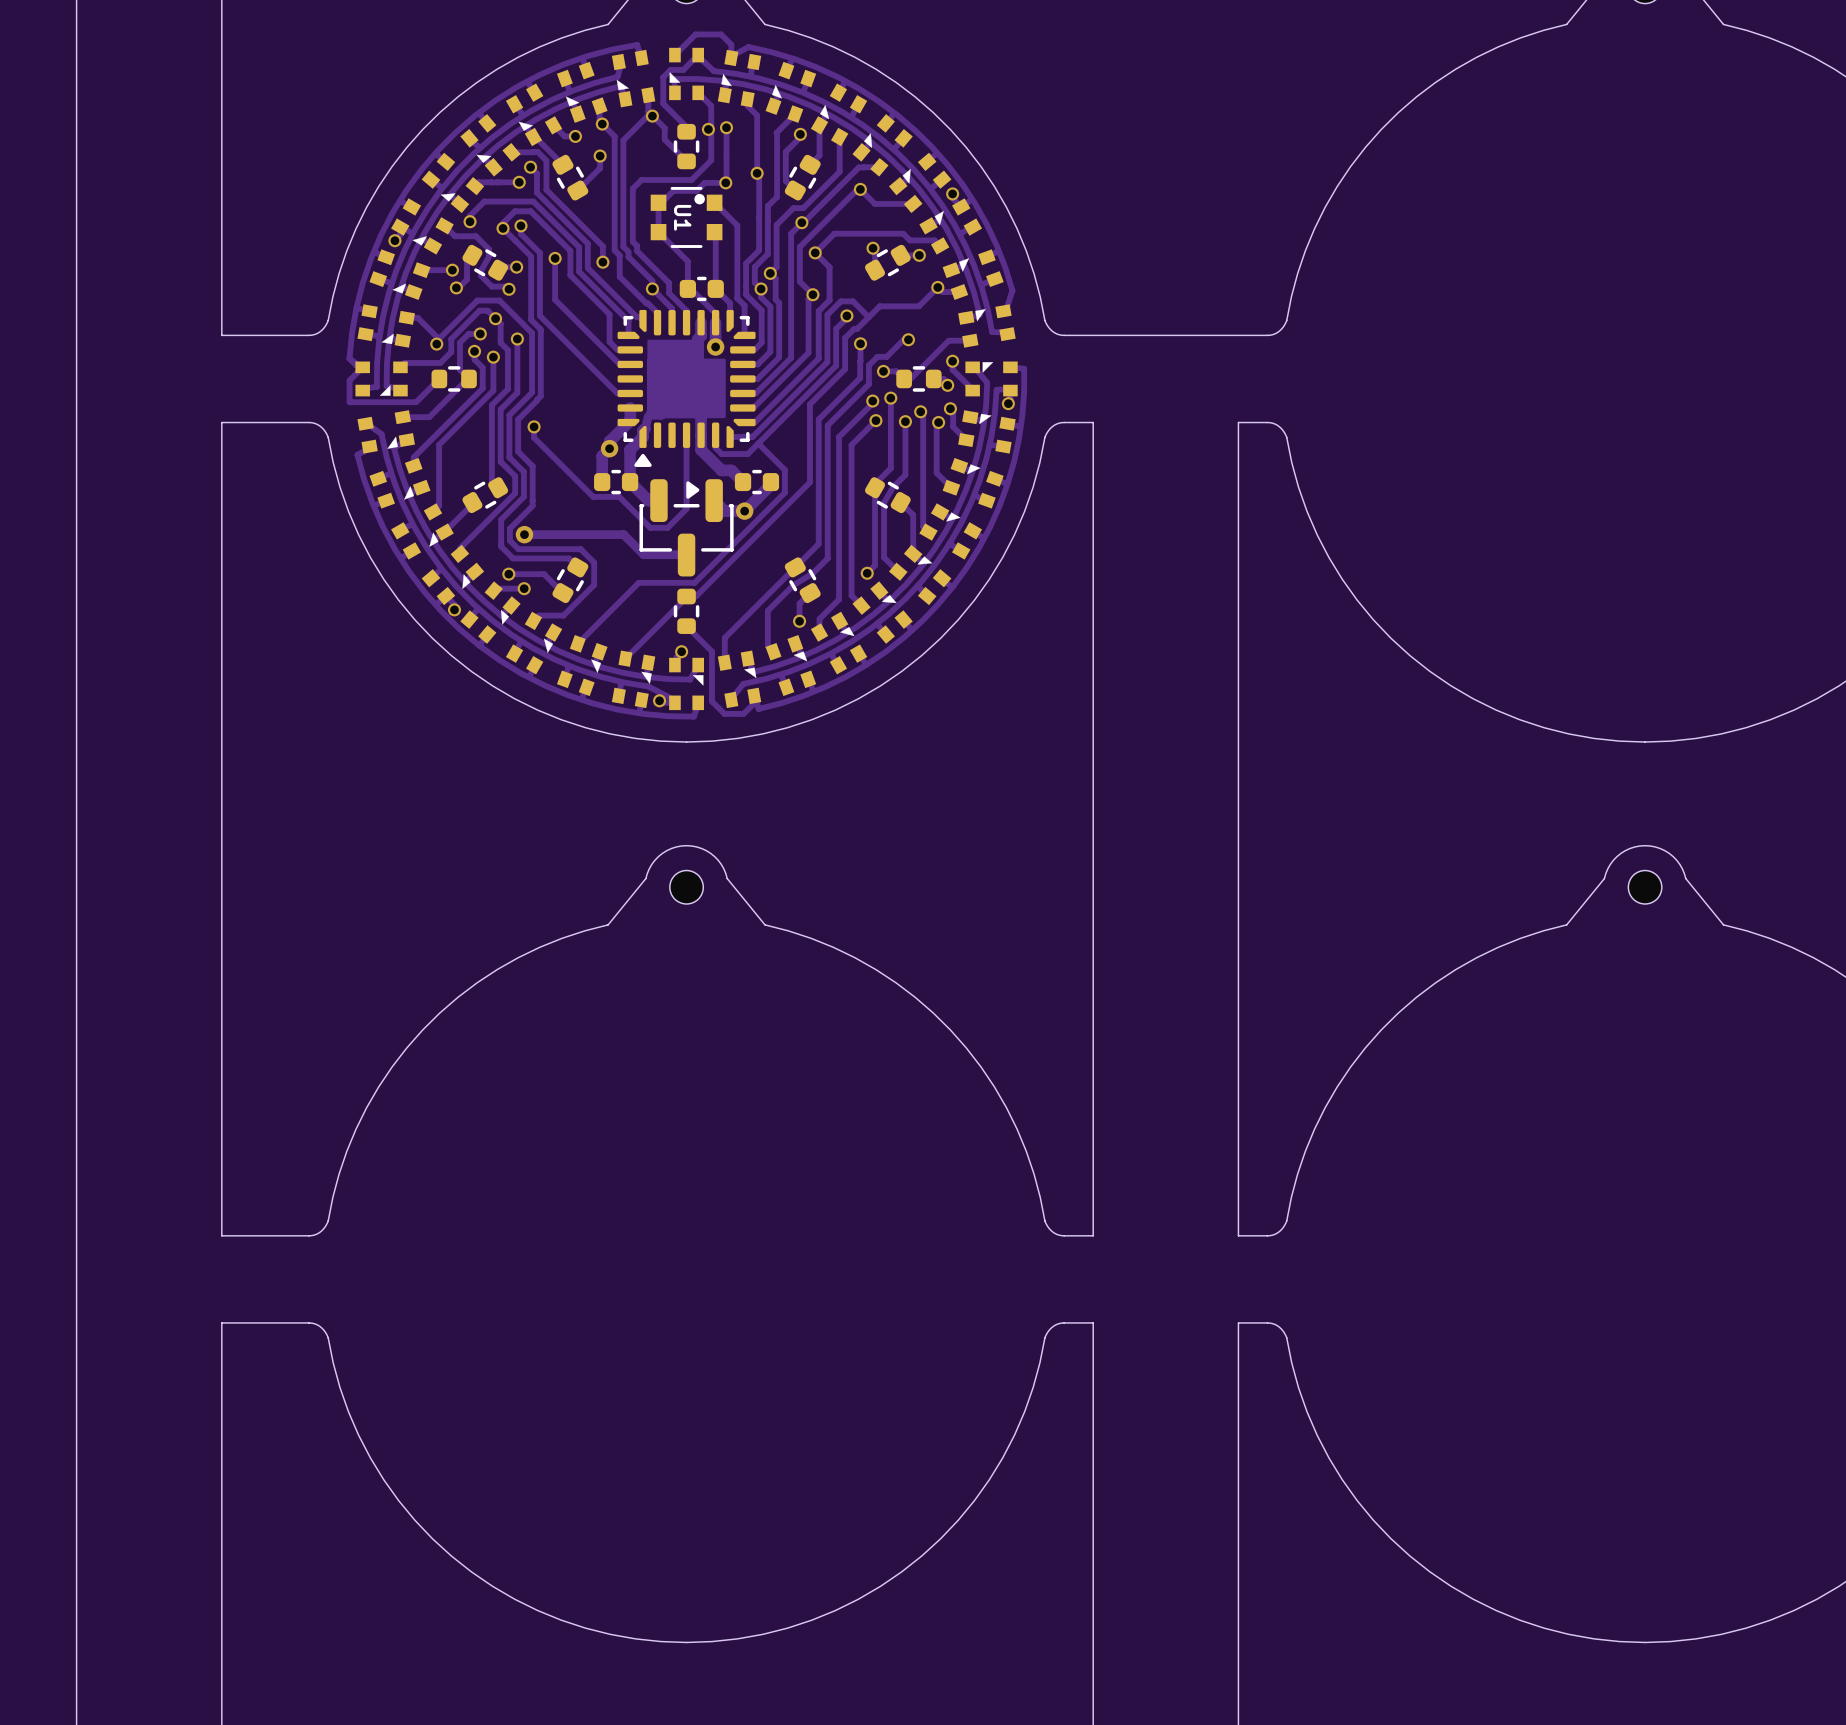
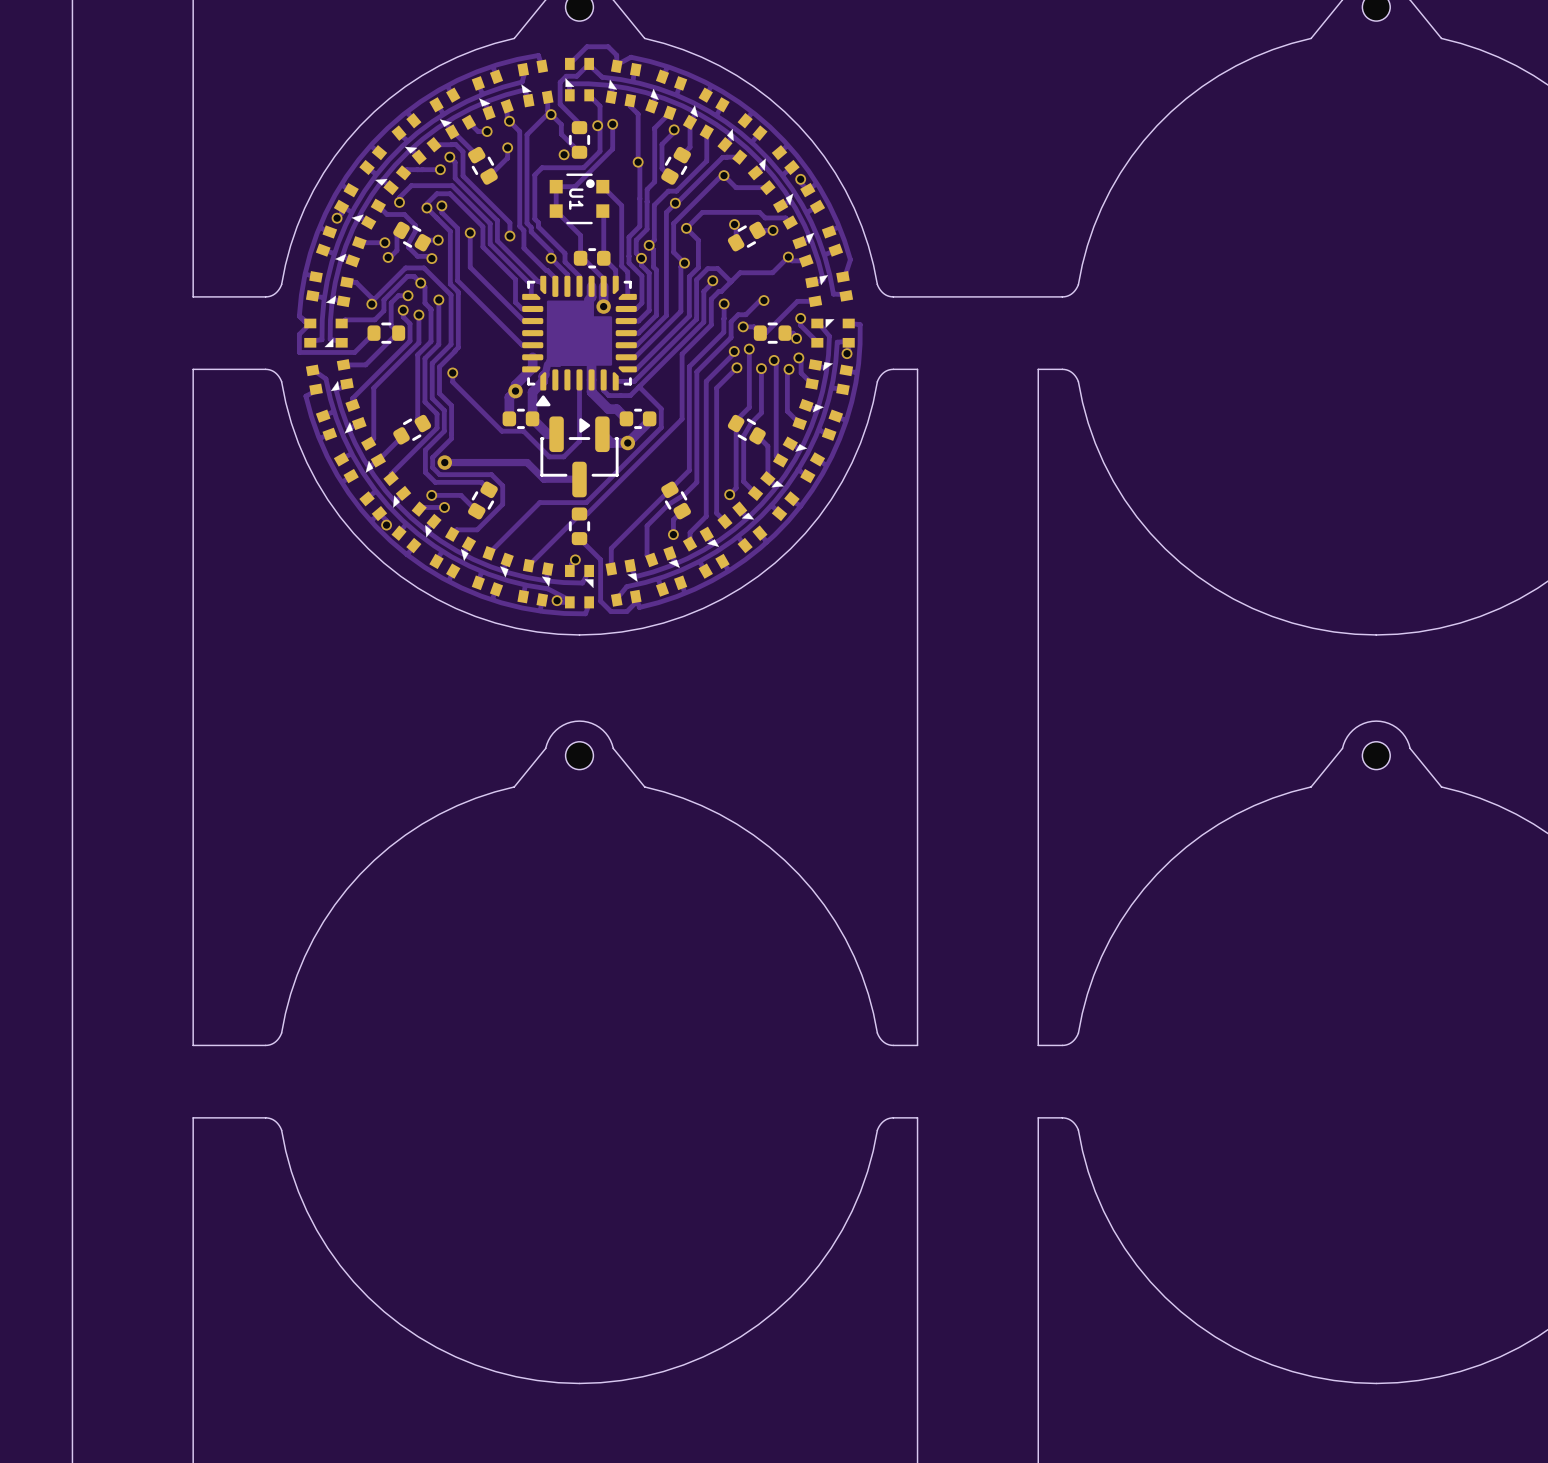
track: (726, 157) (725, 182) (704, 182) (696, 190) (673, 190) (661, 202) -> (612, 149) (575, 186) (558, 186)
via position: (725, 182) -> (564, 154)

